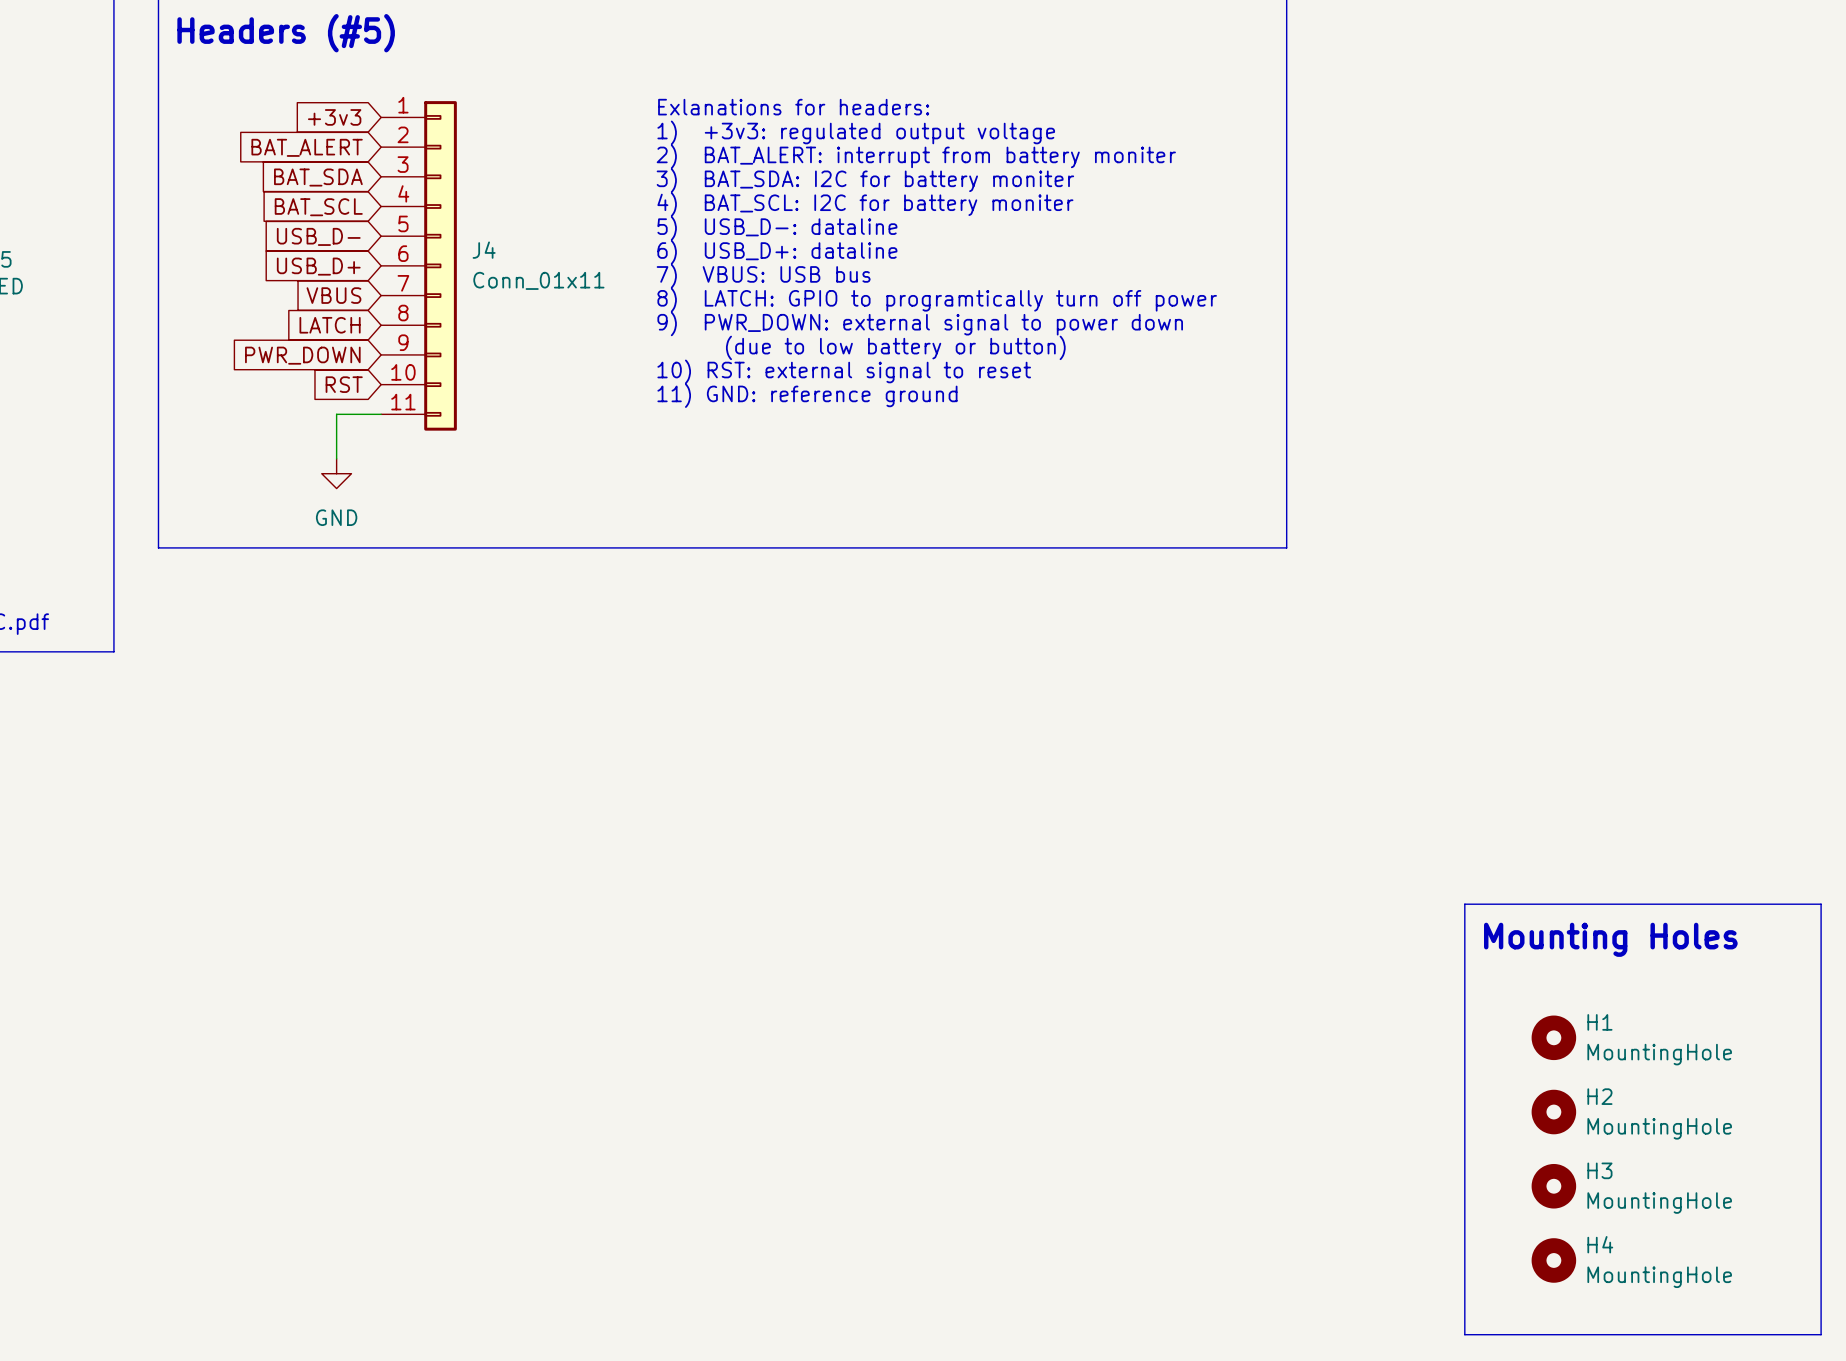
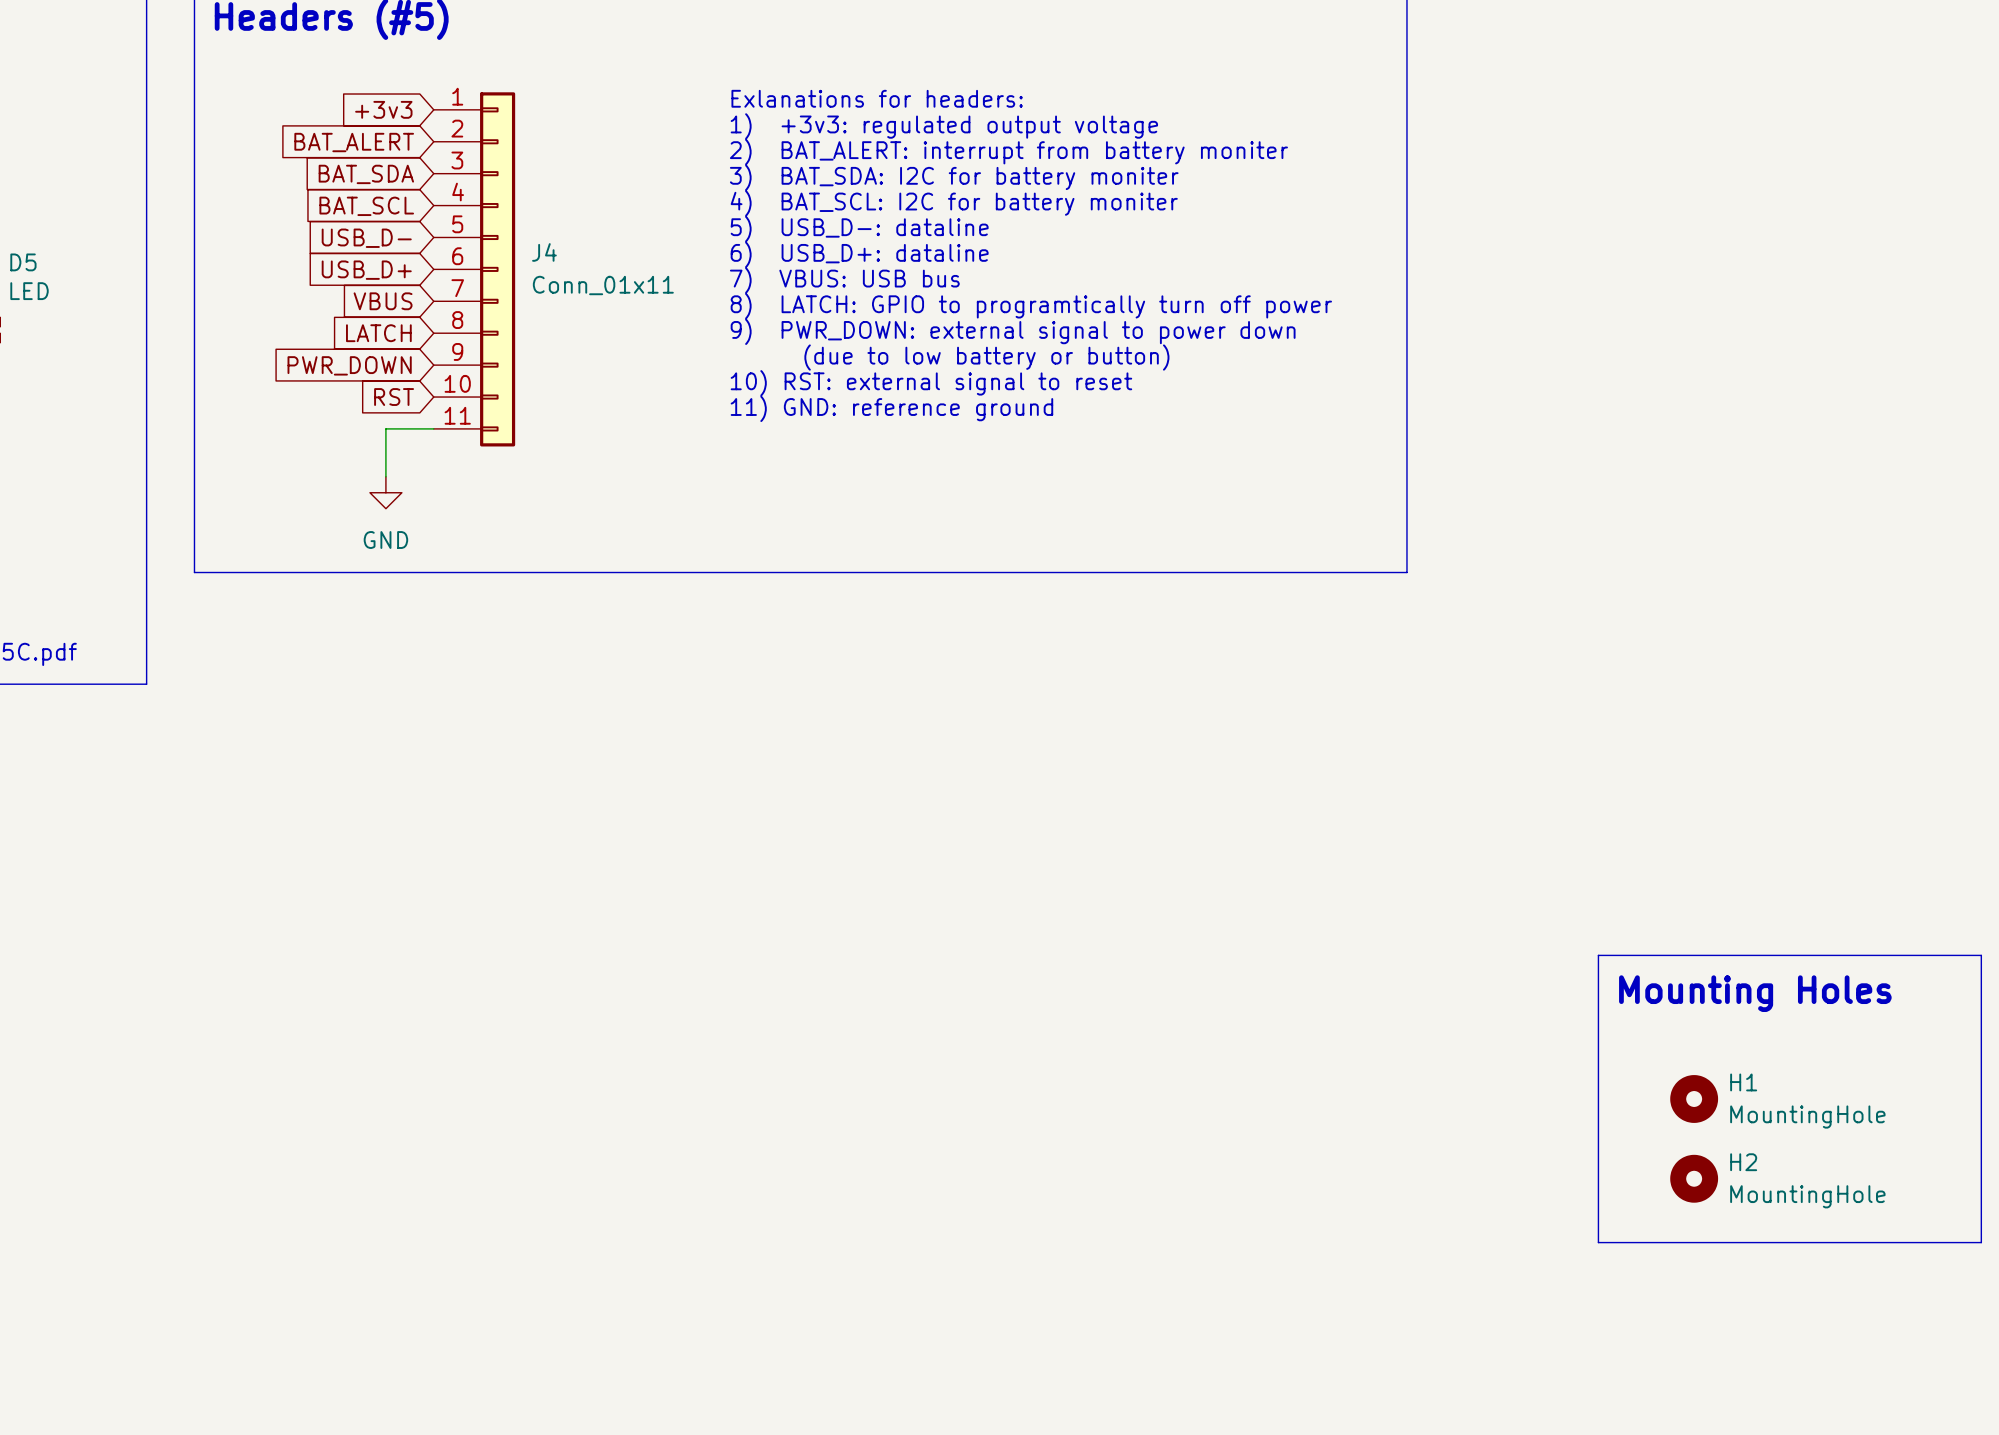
line: (1464, 1171) (1464, 1334) (1821, 1334) (1821, 1171) -> (1598, 1242) (1981, 1242)
H3: MountingHole (1553, 1186) -> none
H4: MountingHole (1553, 1260) -> none

